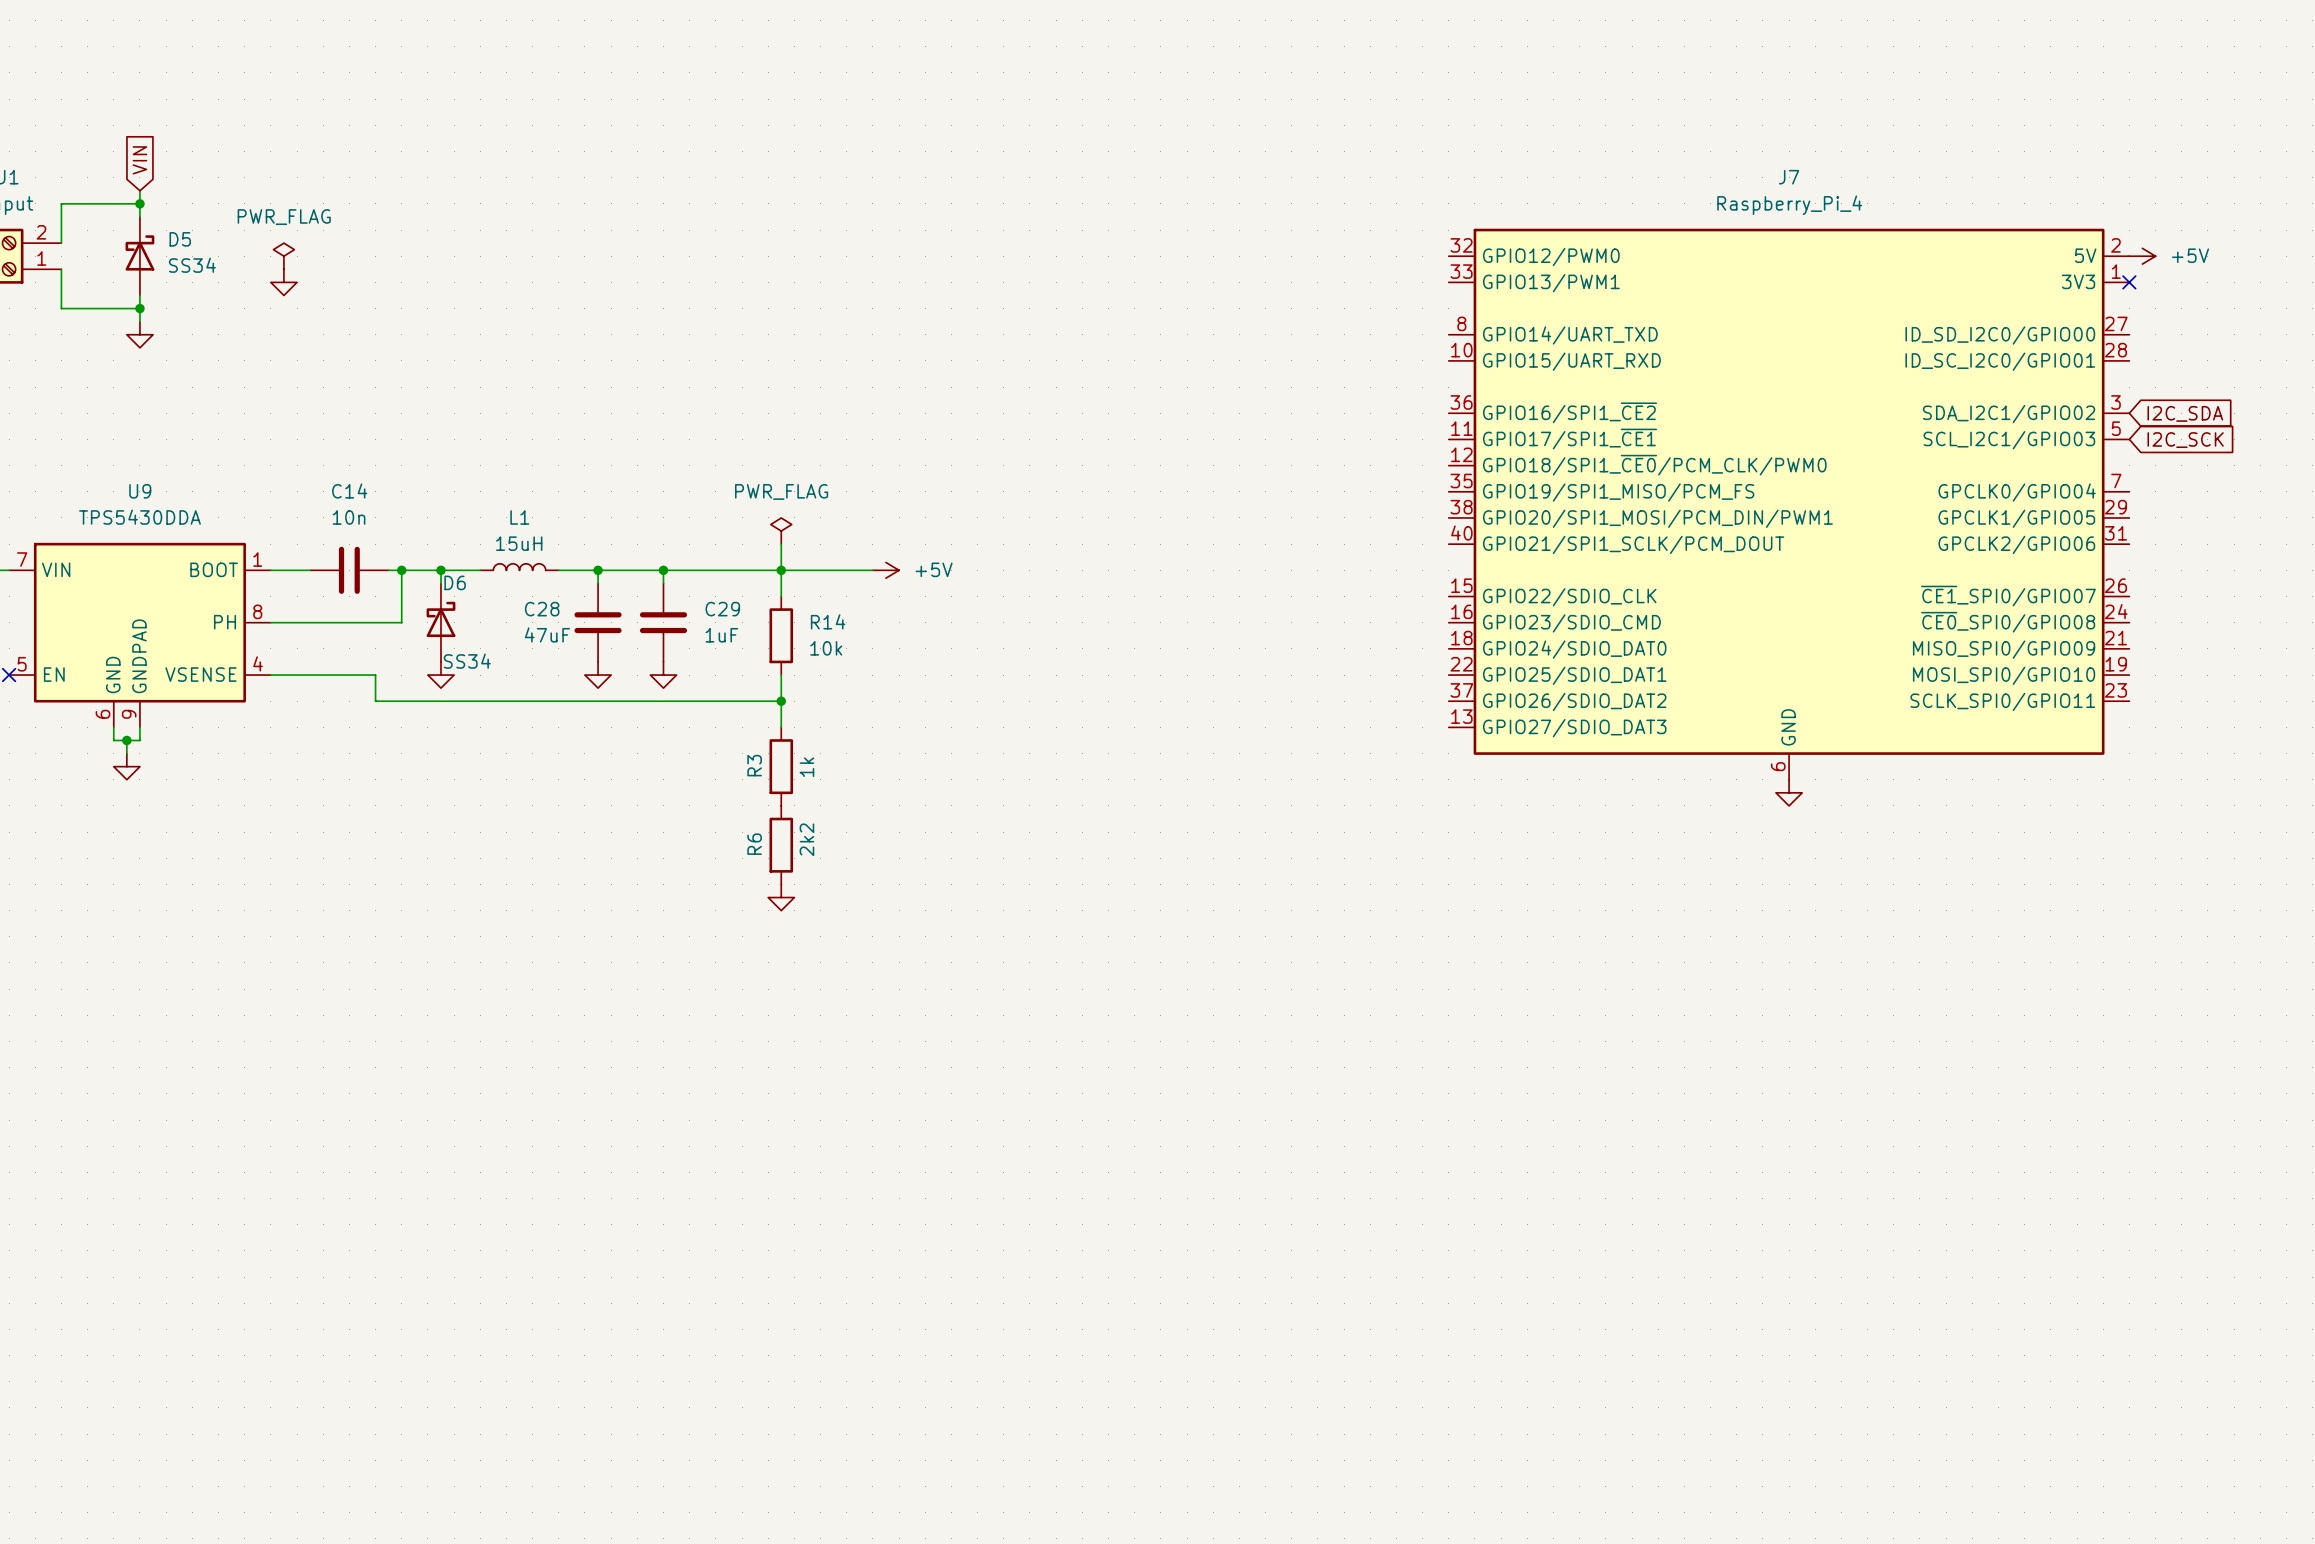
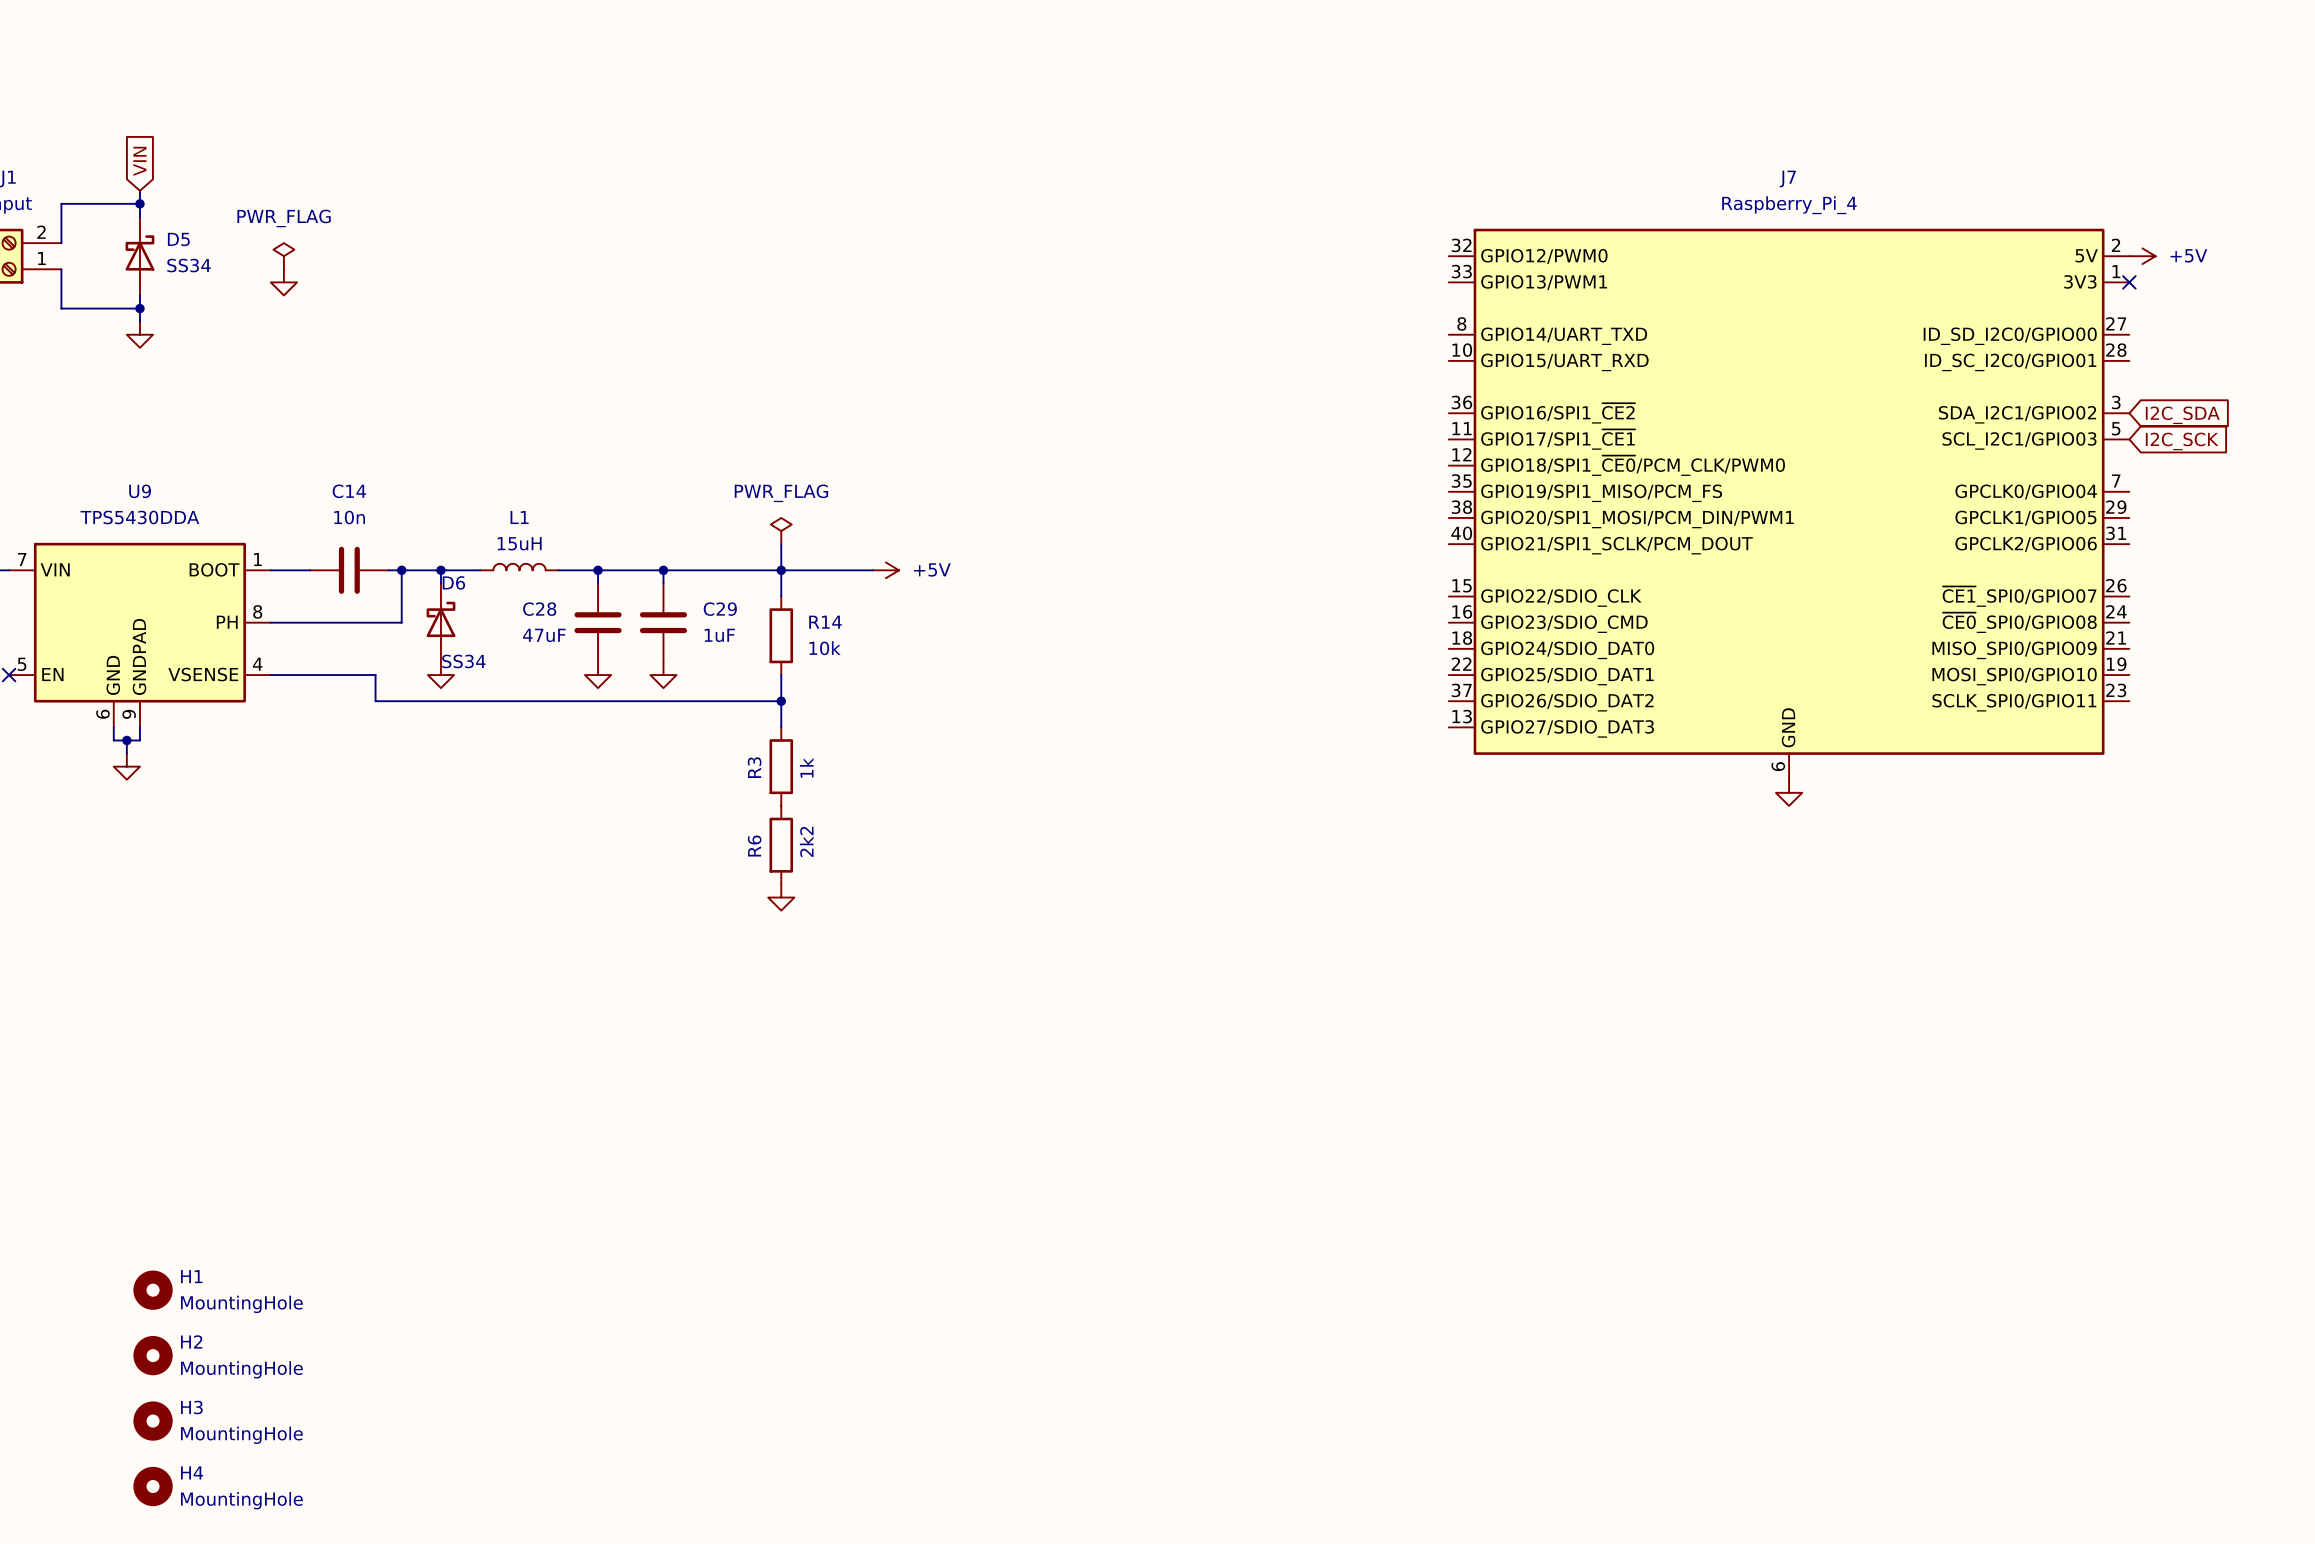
H1: none -> MountingHole (153, 1290)
H2: none -> MountingHole (153, 1355)
H3: none -> MountingHole (153, 1421)
H4: none -> MountingHole (153, 1486)

